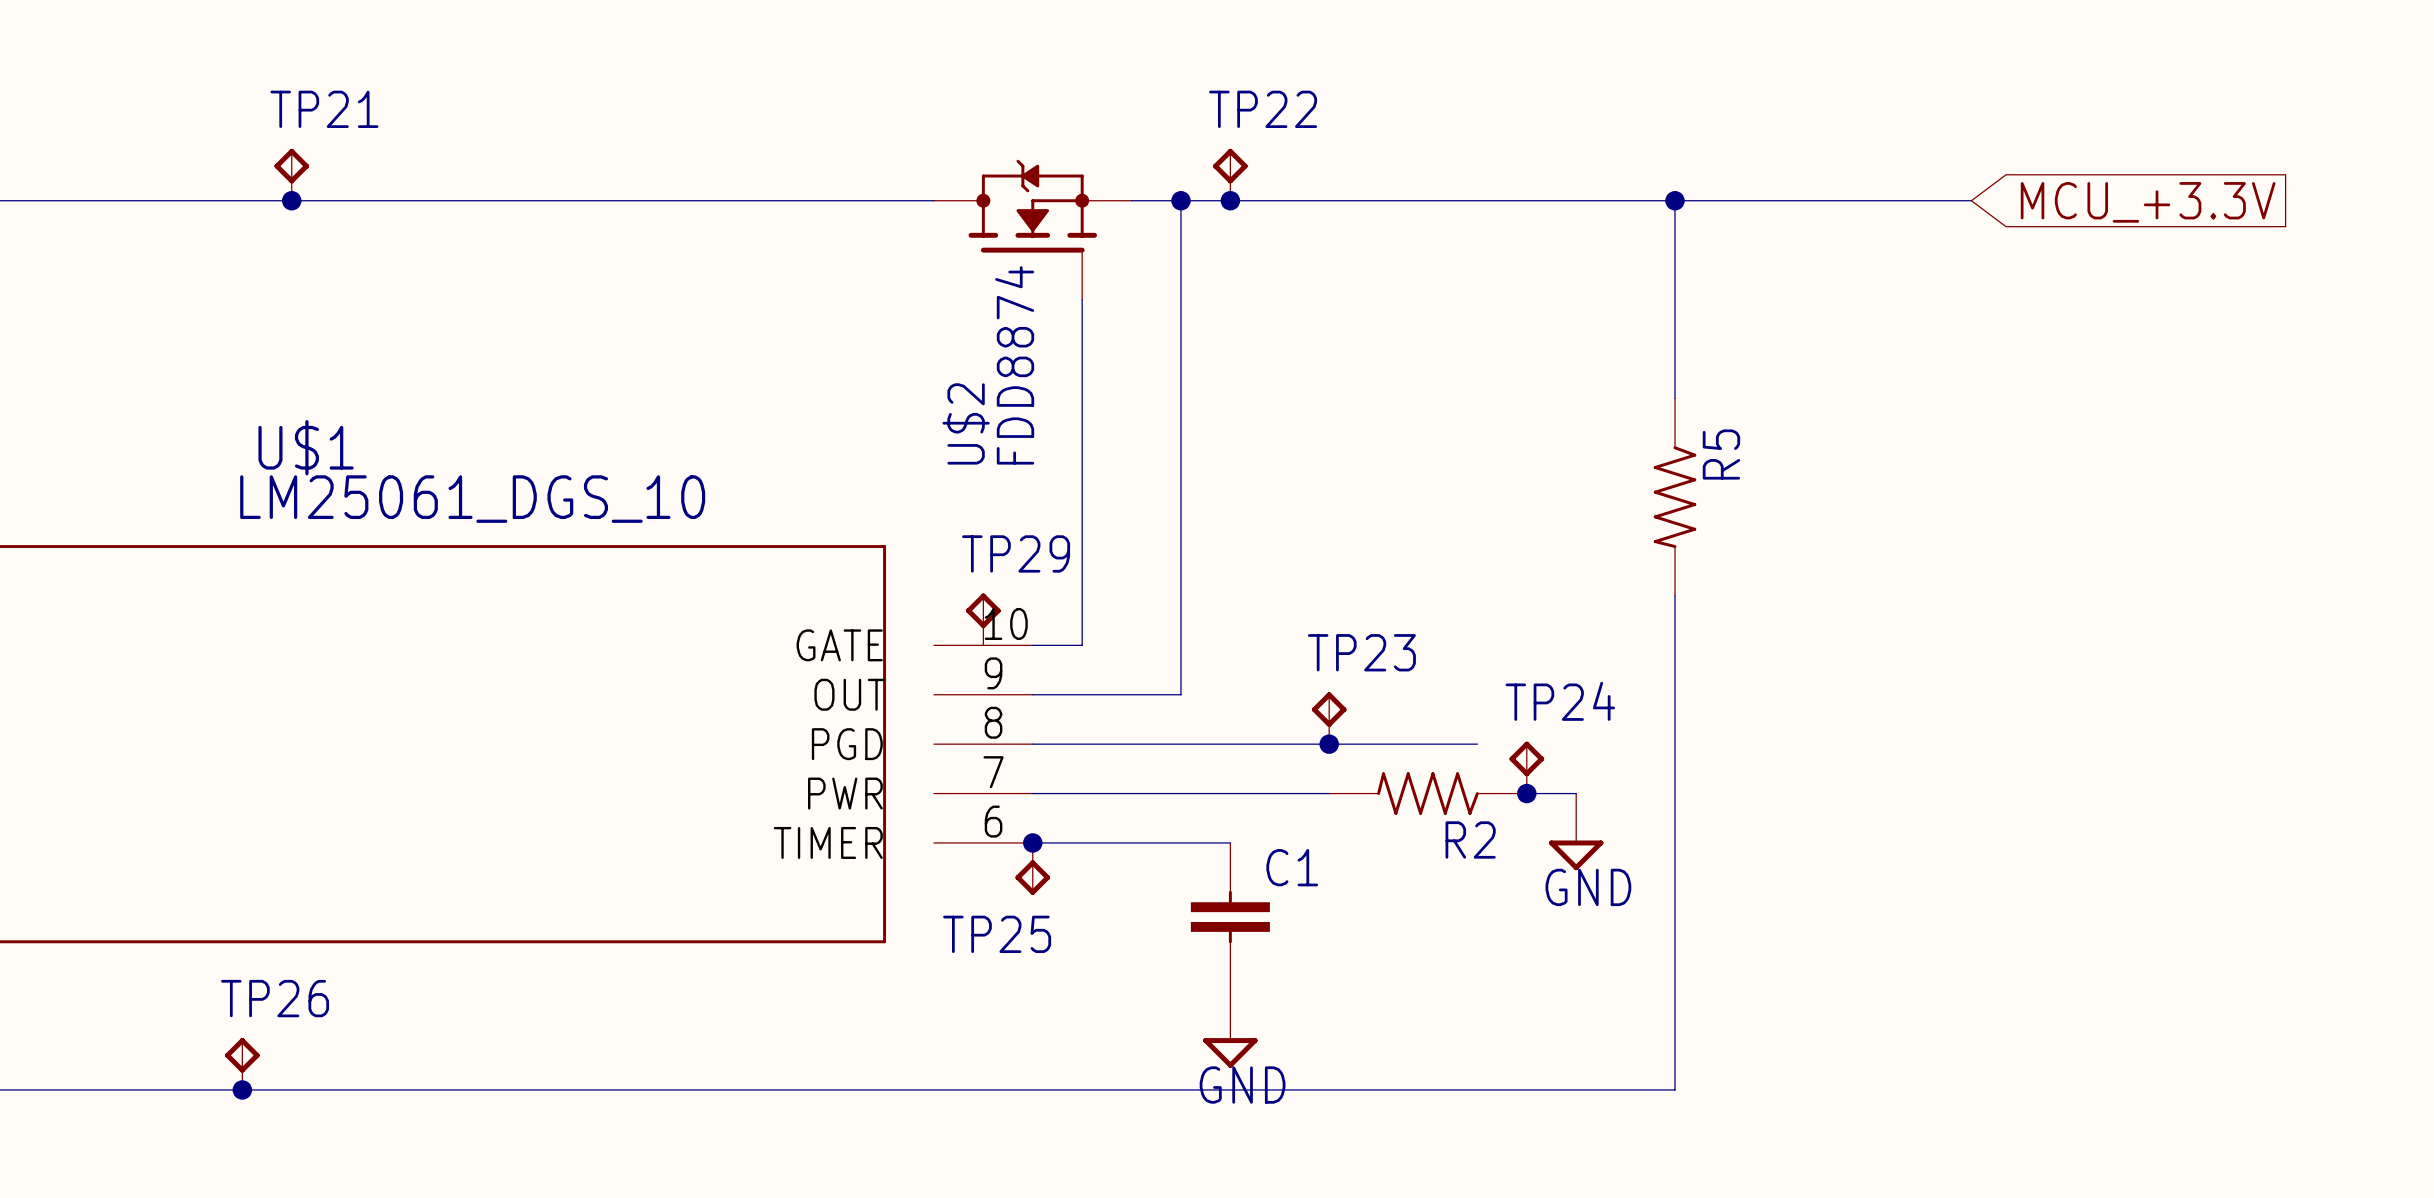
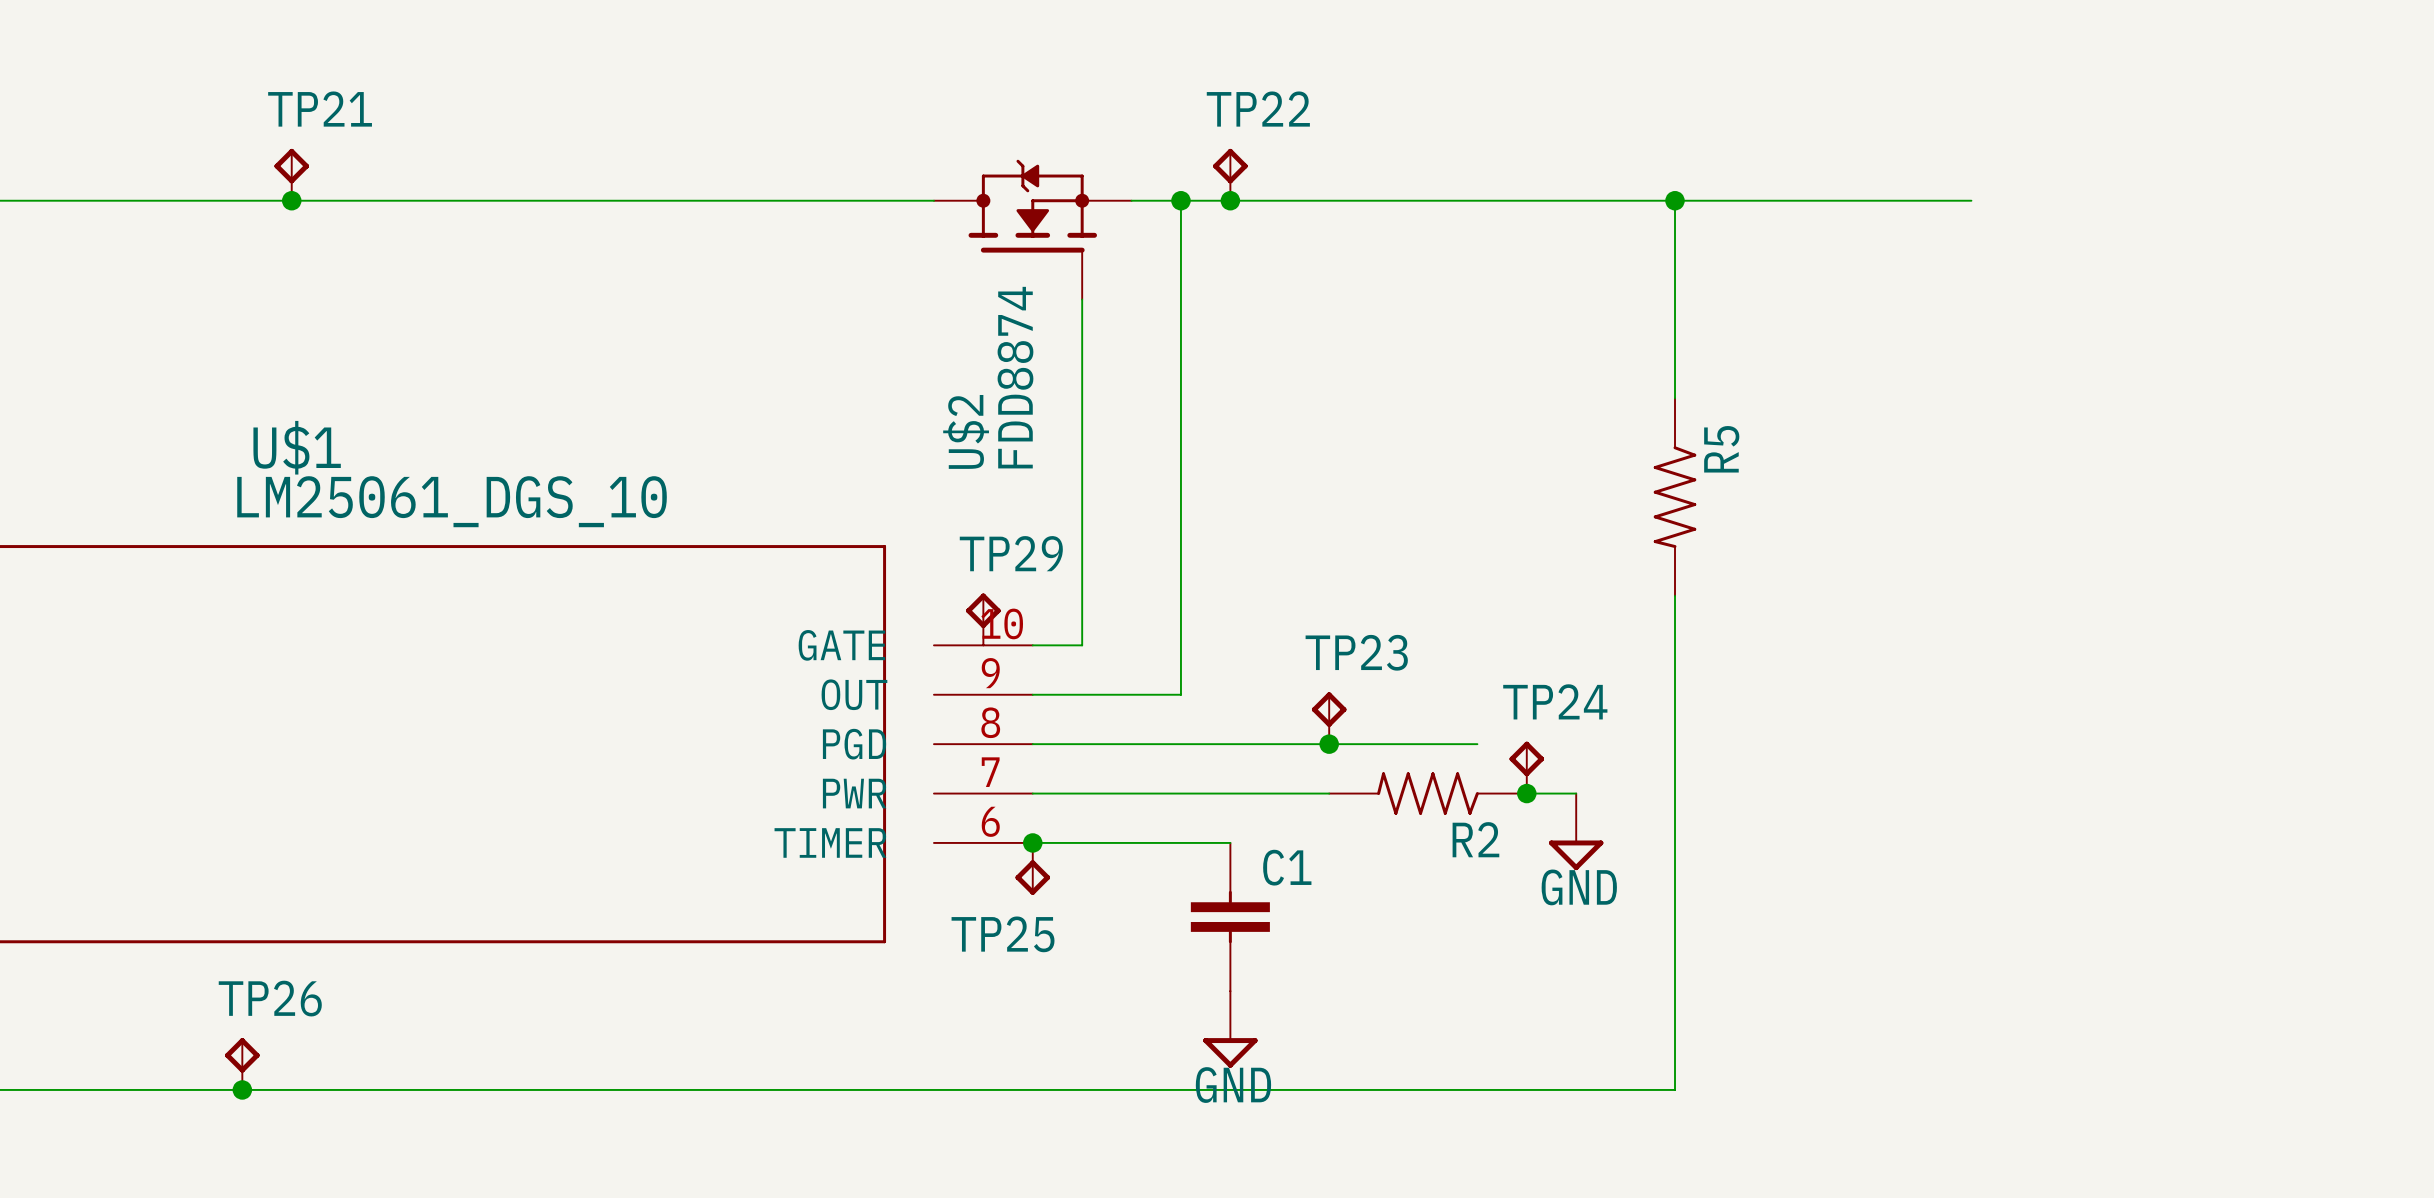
global label: MCU_+3.3V (2148, 202) -> none

